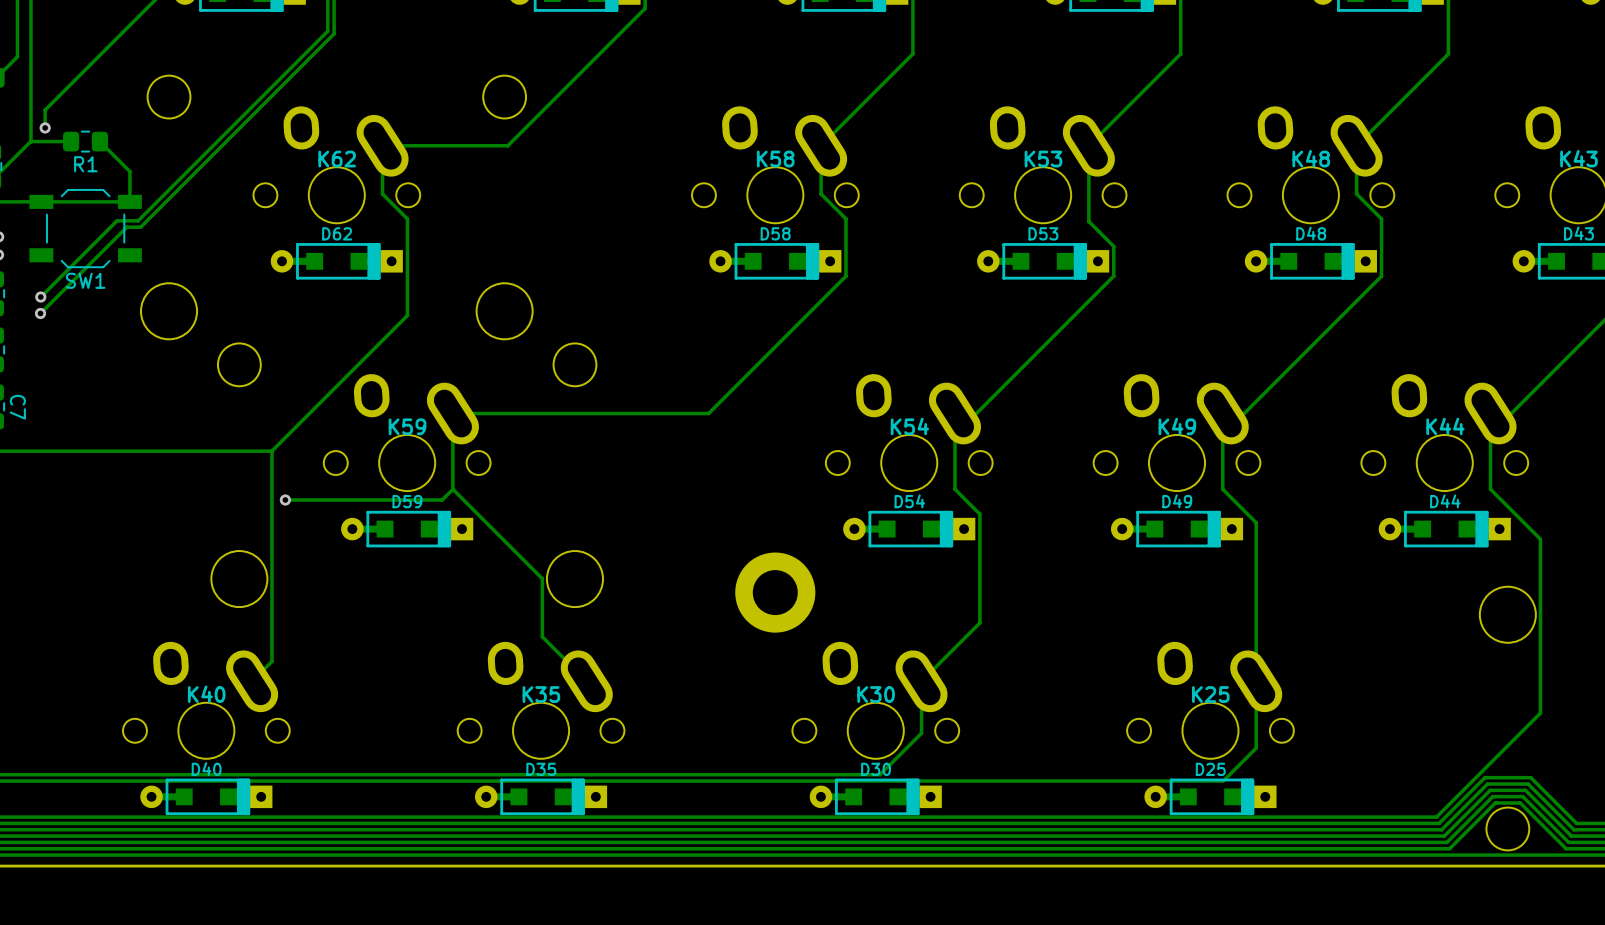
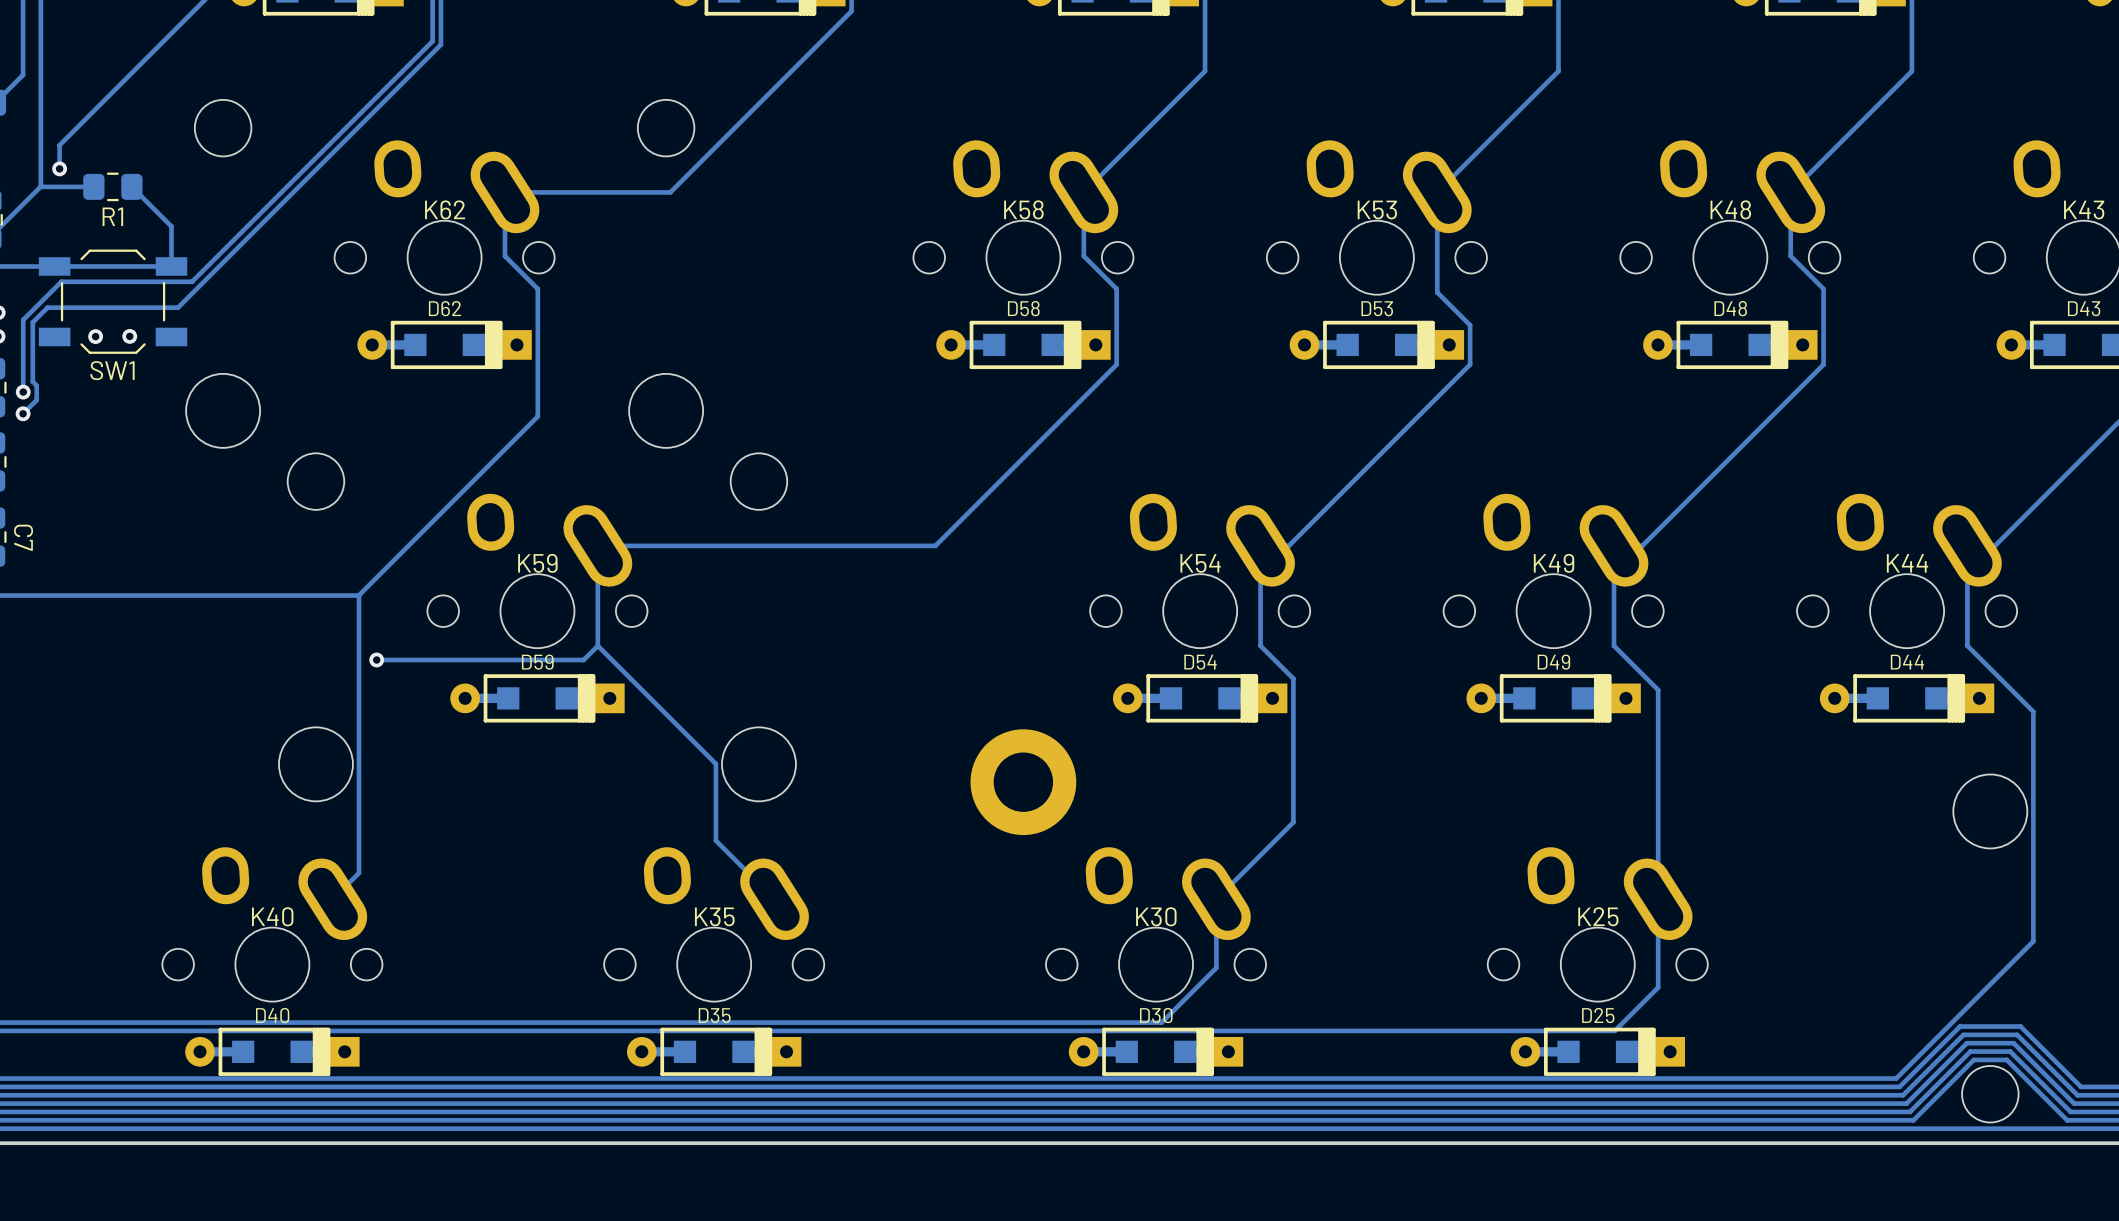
track: (145, 213) (138, 220) (116, 220) (40, 297) -> (192, 281) (61, 281) (23, 319) (23, 392)
track: (140, 227) (126, 227) (40, 313) -> (185, 299) (178, 307) (47, 307) (32, 322) (32, 381) (36, 385) (36, 400) (23, 413)
via: none -> (129, 336)
via: none -> (95, 336)
via: none -> (23, 392)
via: (40, 297) -> none
via: none -> (23, 413)
via: (40, 313) -> none

